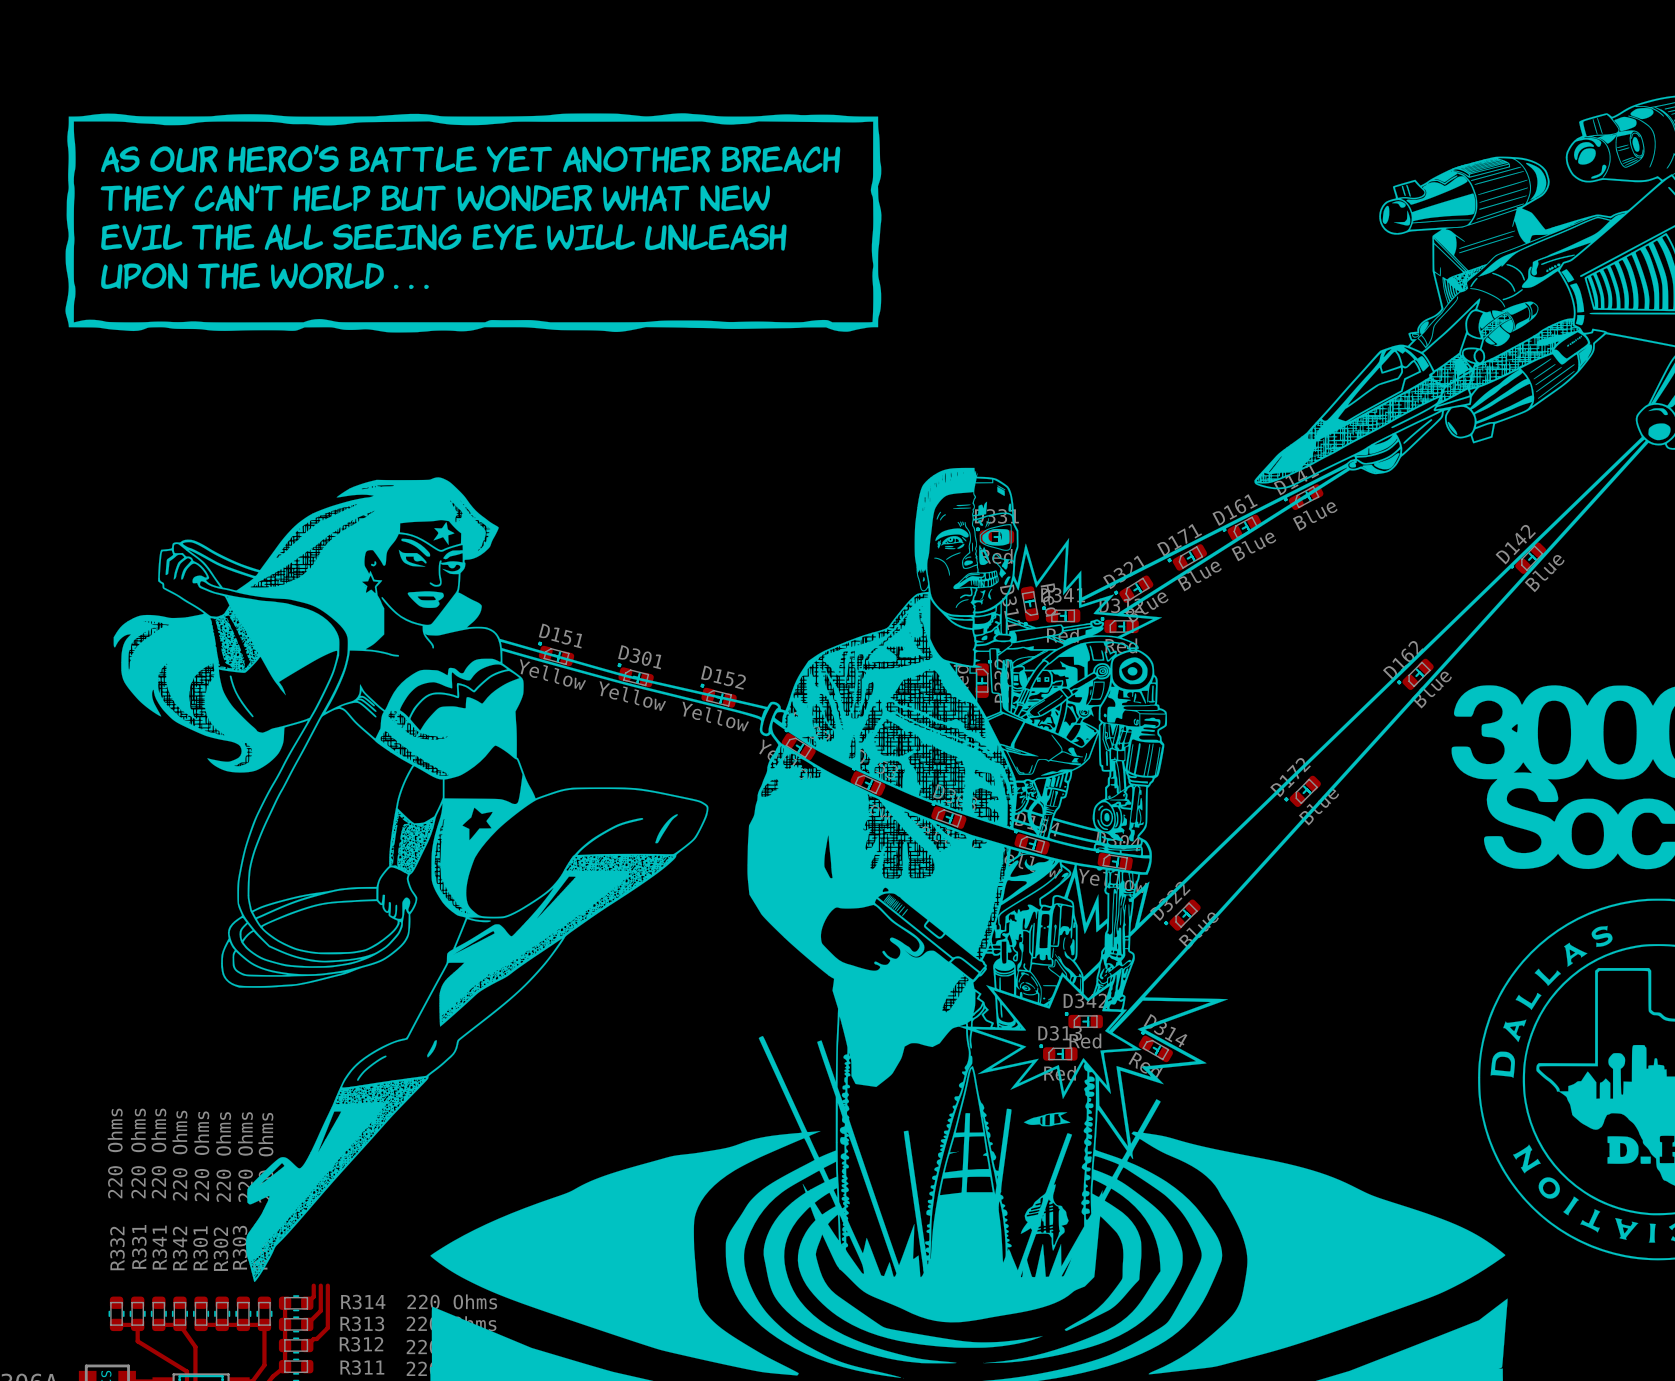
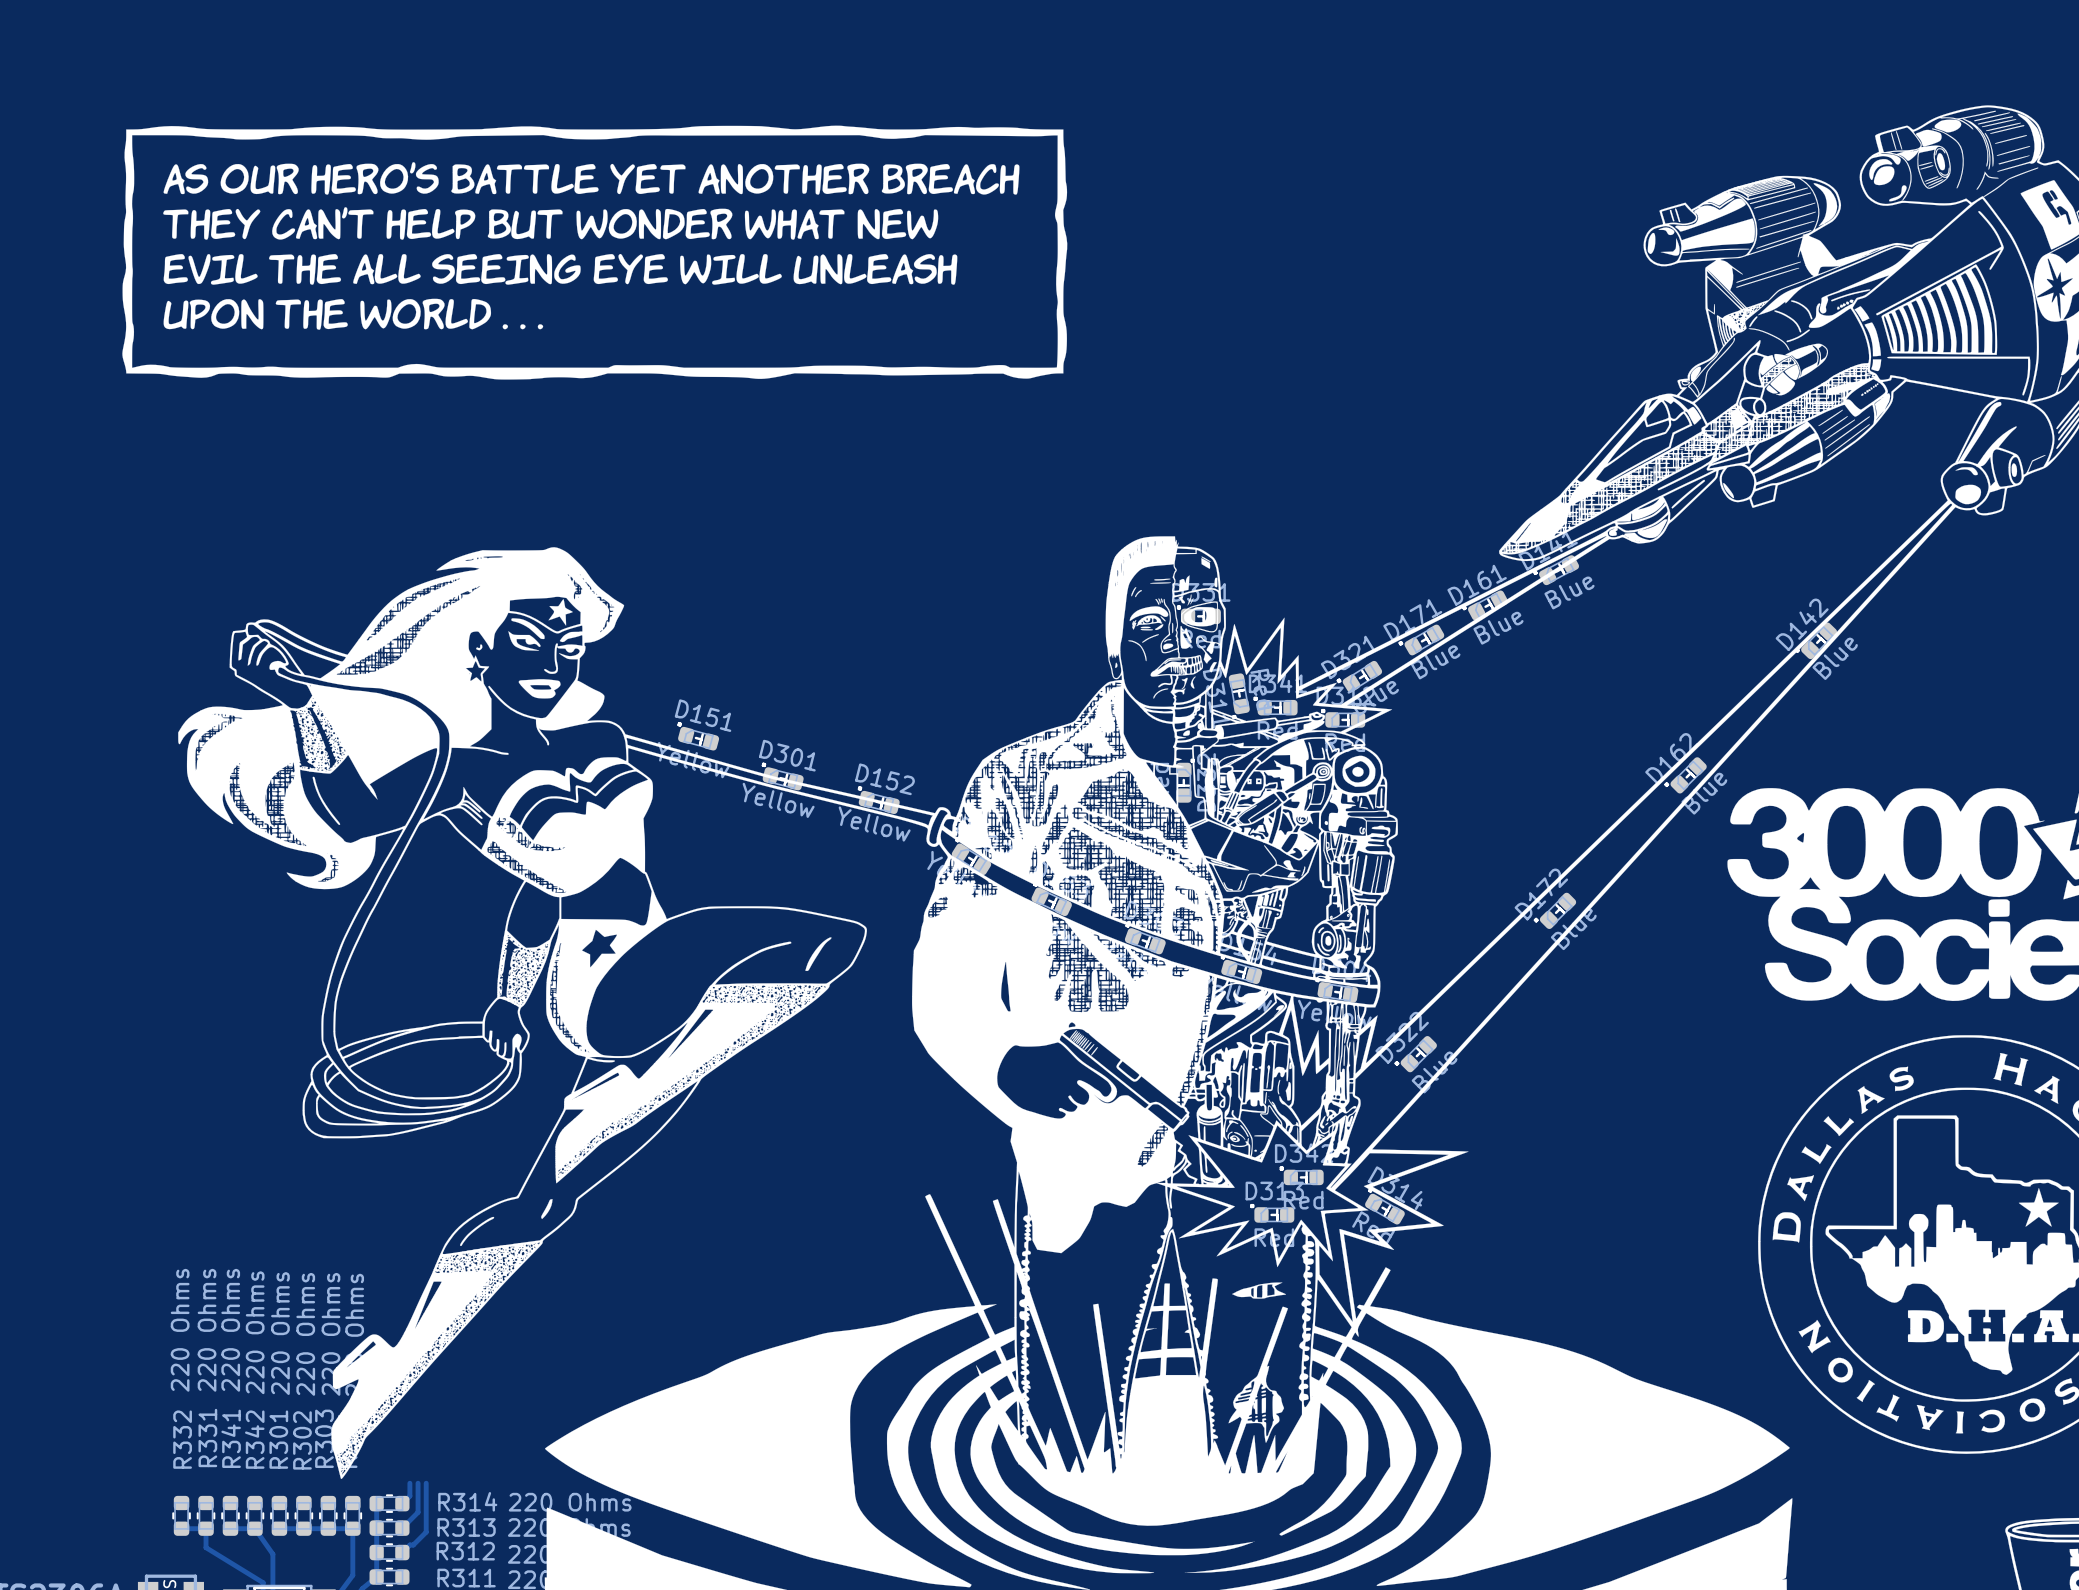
D151 position: (556, 653) -> (698, 736)

